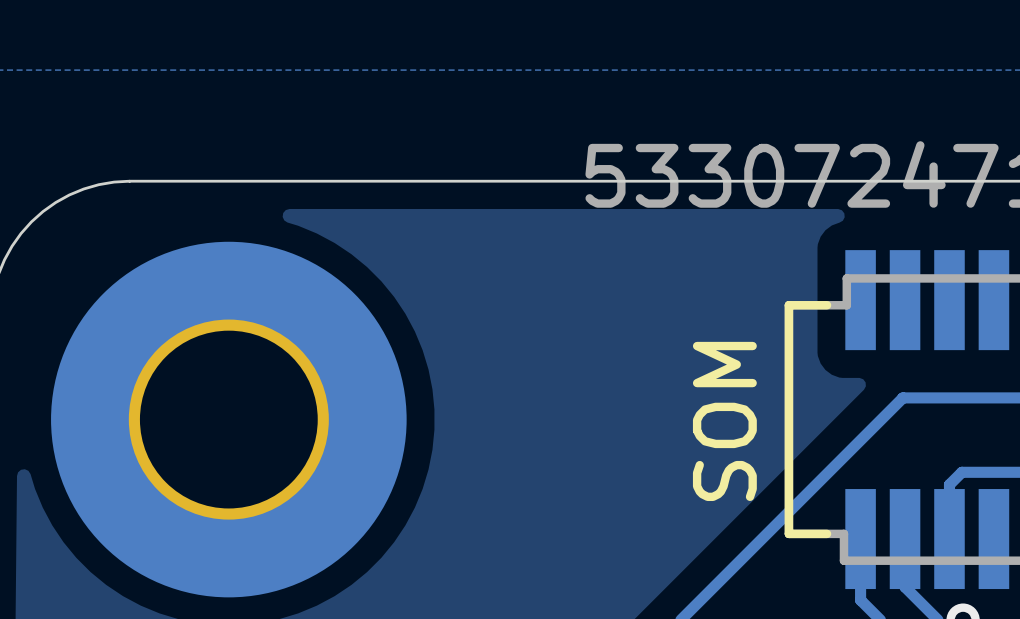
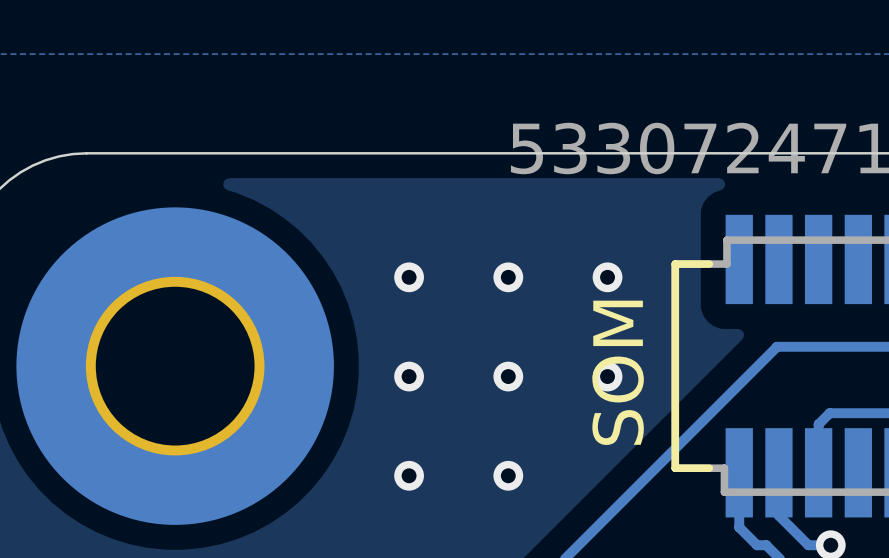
via: none -> (409, 277)
via: none -> (508, 277)
via: none -> (607, 277)
via: none -> (409, 376)
via: none -> (508, 376)
via: none -> (607, 376)
via: none -> (409, 475)
via: none -> (508, 475)

